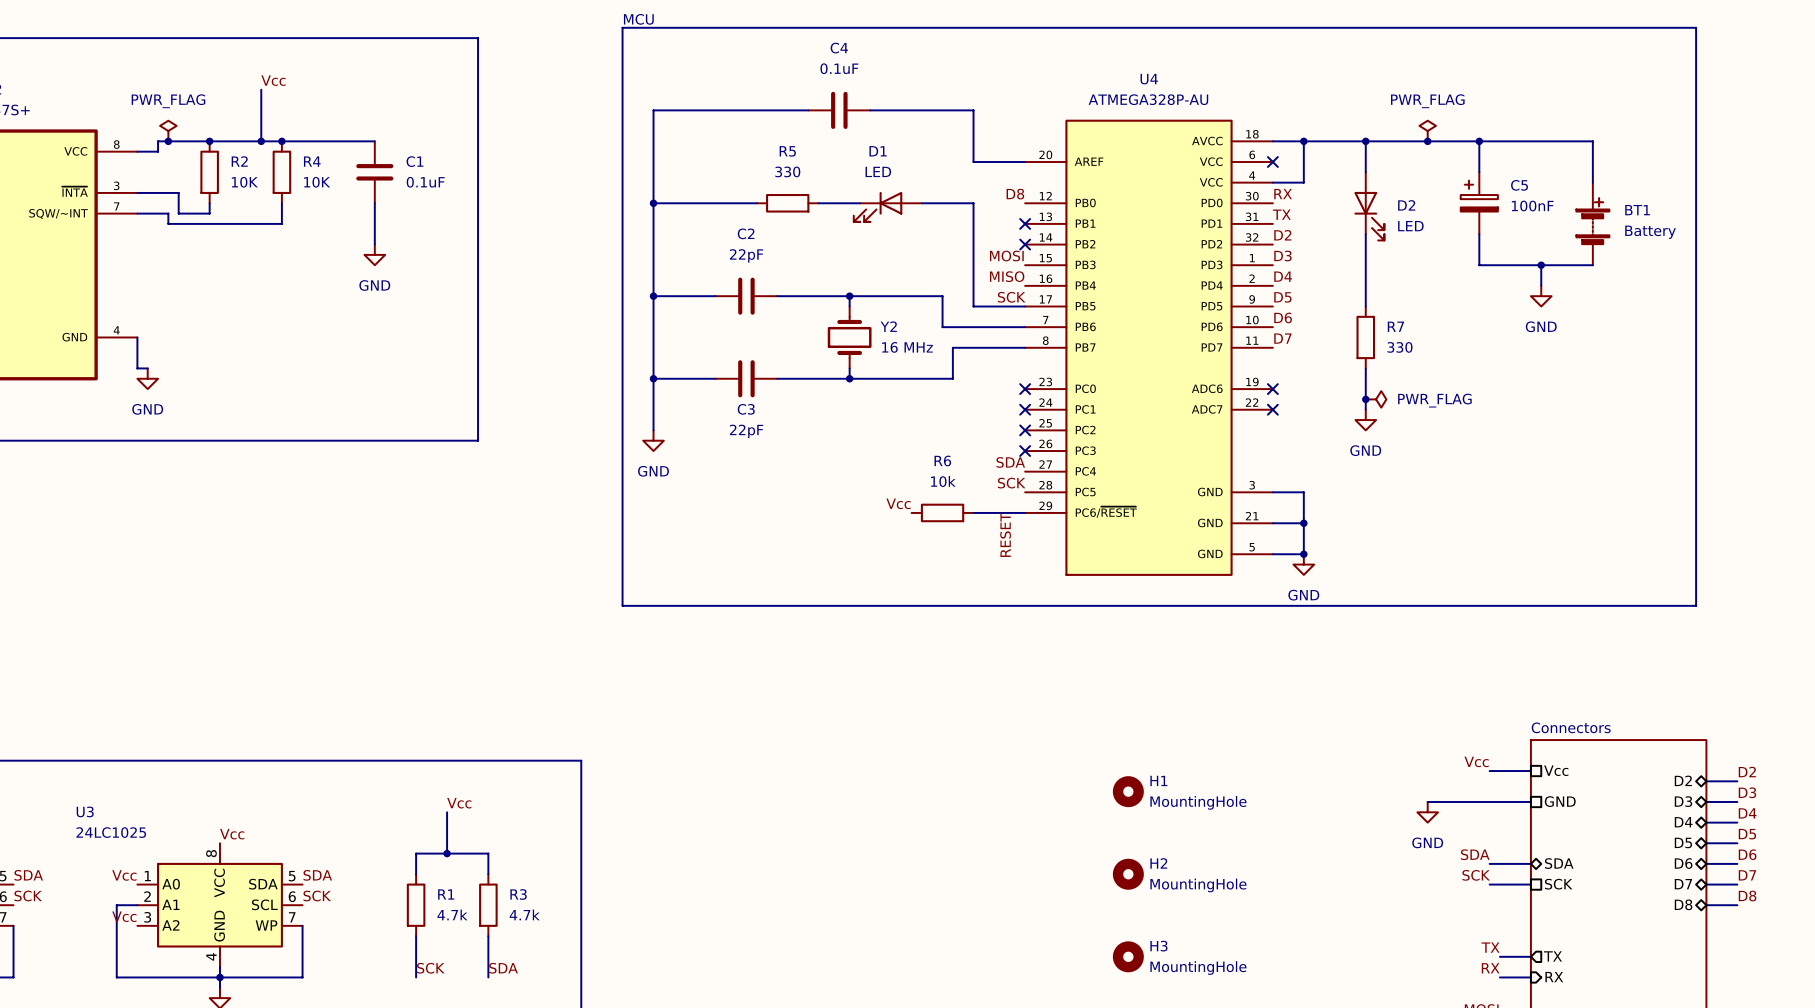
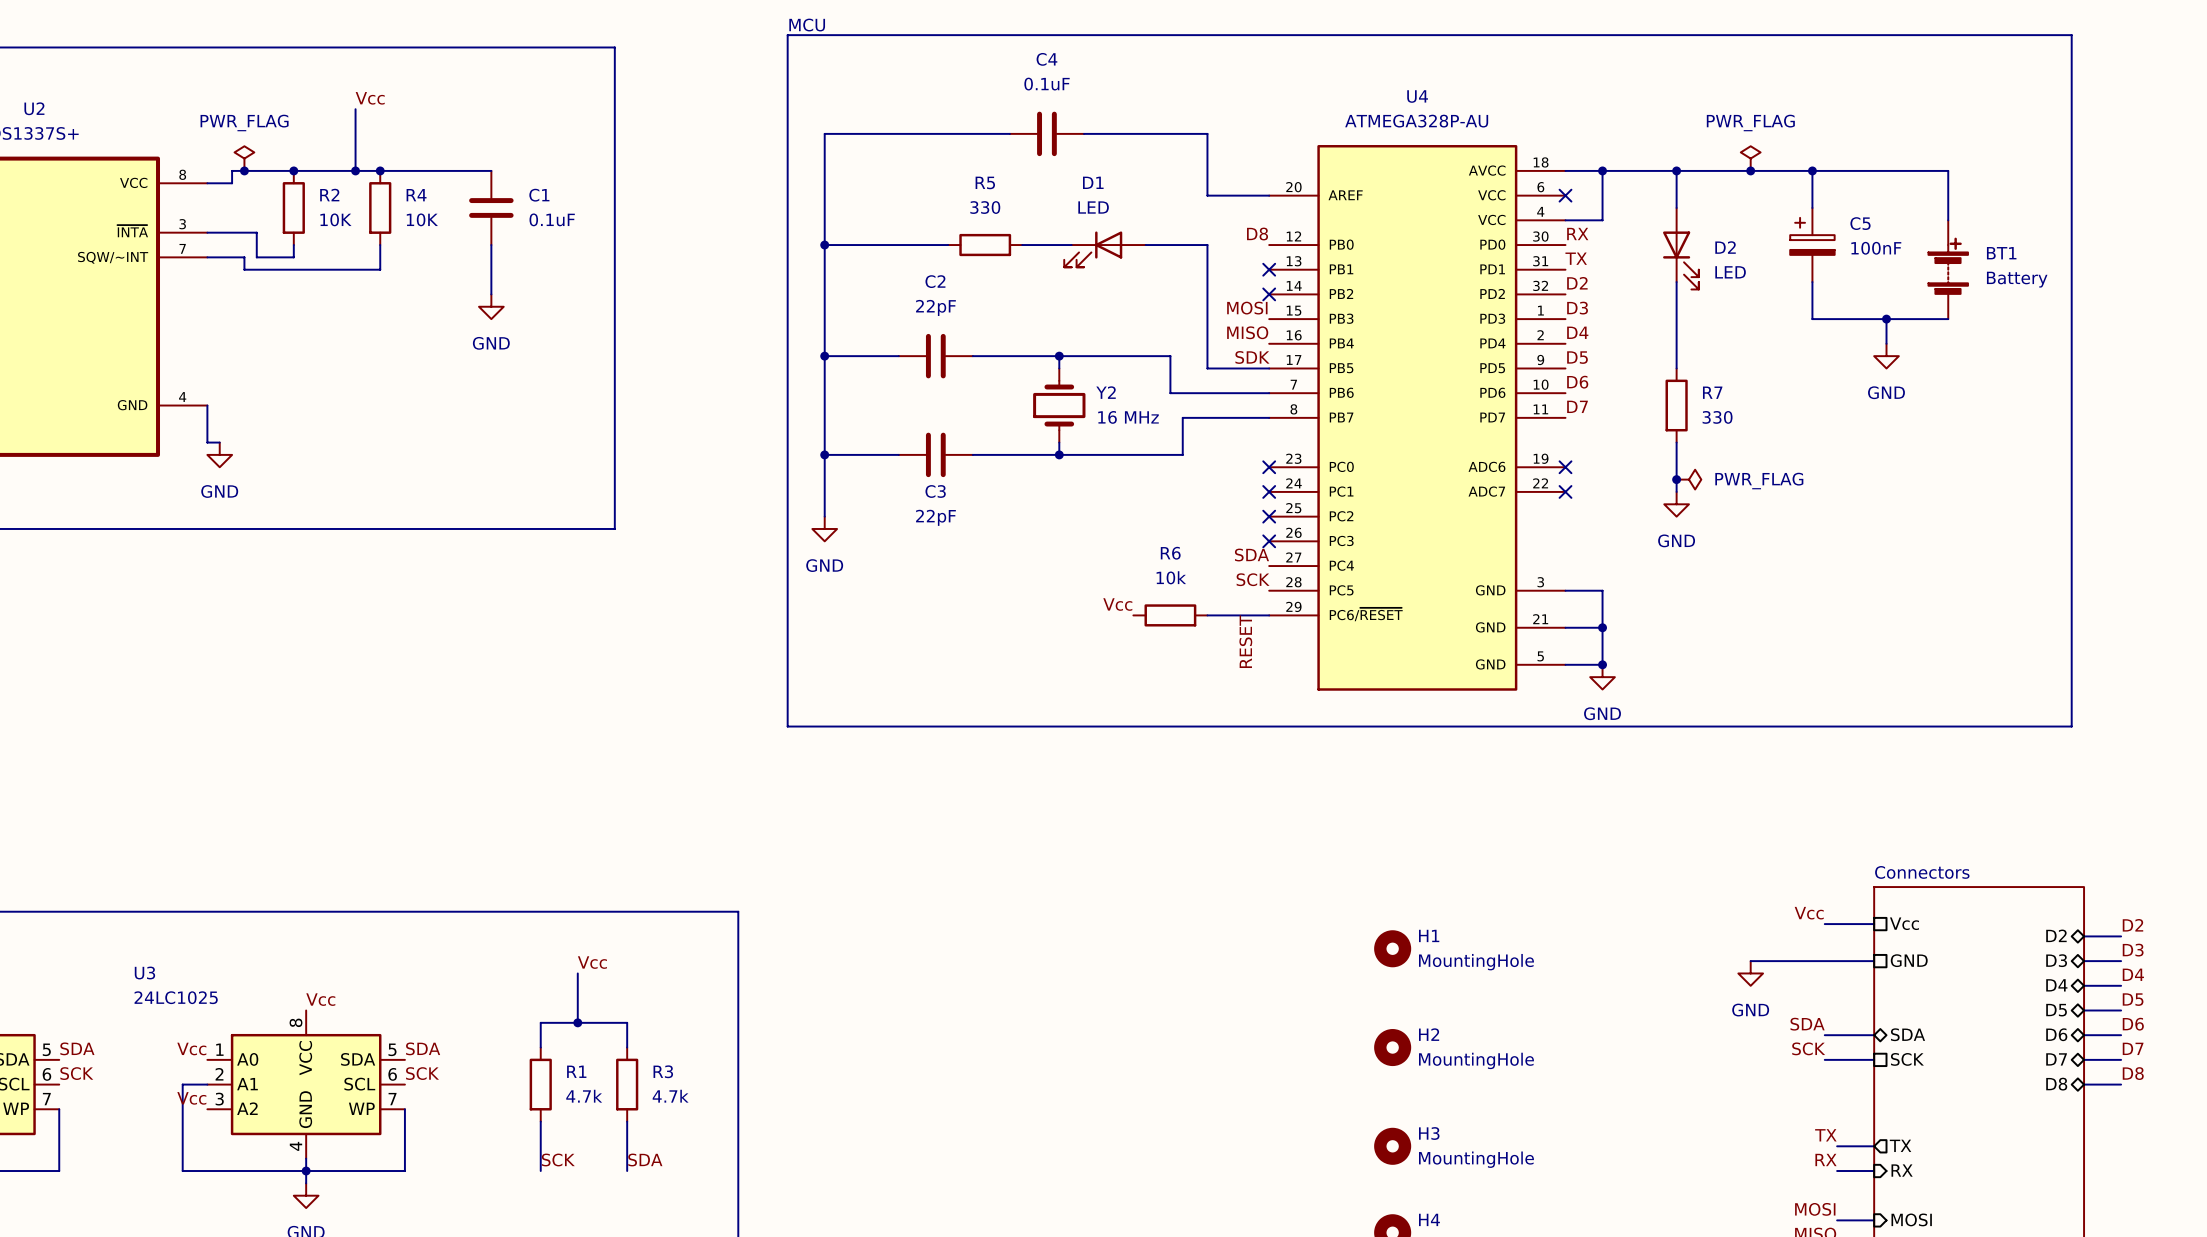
label: SCK (1011, 297) -> SDK (1252, 357)

